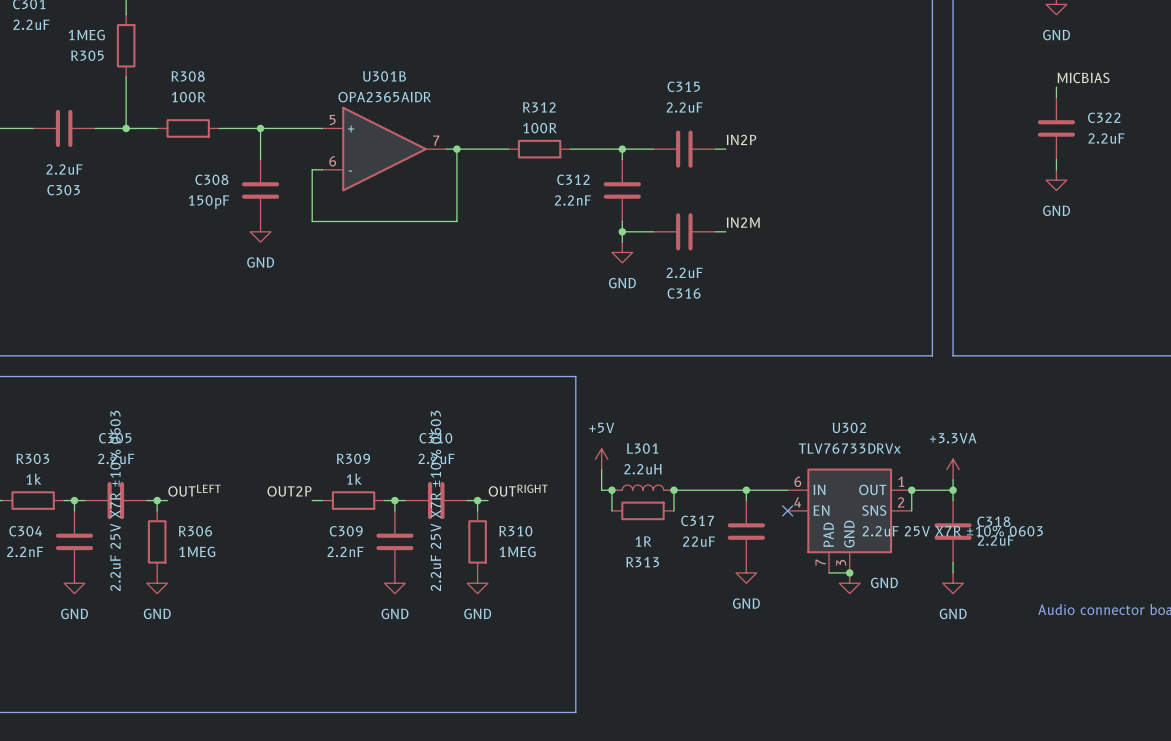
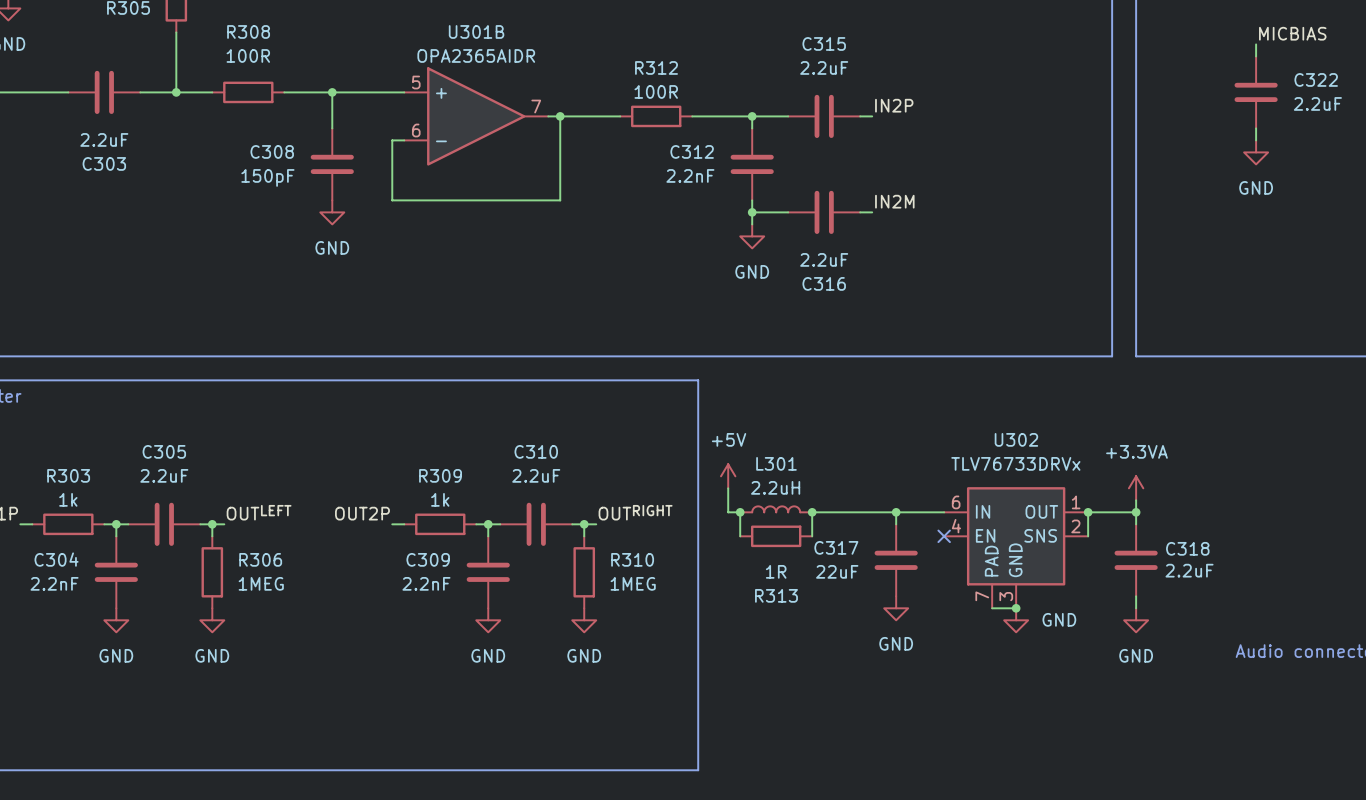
C305 text: 2.2uF 25V X7R ±10% 0603 (115, 500) -> none
C310 text: 2.2uF 25V X7R ±10% 0603 (435, 500) -> none
C318 text: 2.2uF 25V X7R ±10% 0603 (952, 531) -> none

